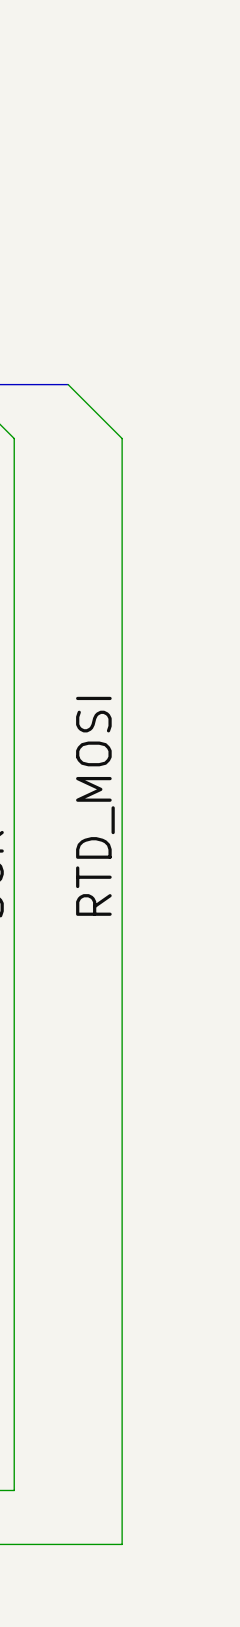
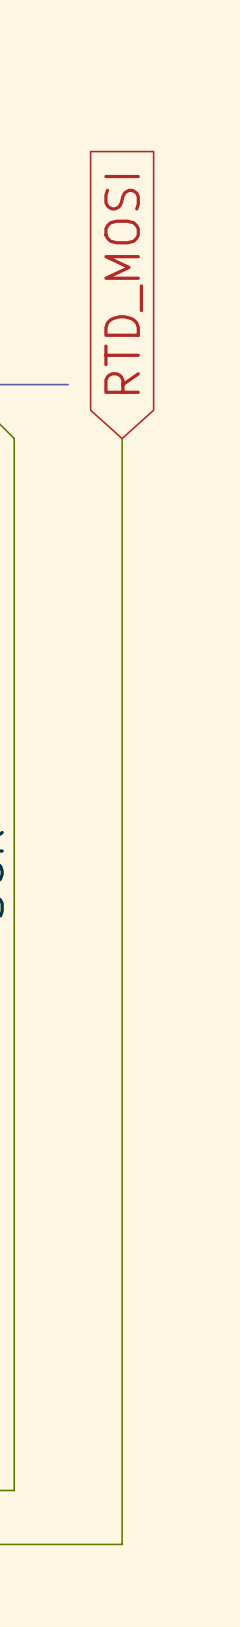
global label: none -> RTD_MOSI (123, 284)
wire: (68, 384) (122, 438) -> none
label: RTD_MOSI (95, 806) -> none

